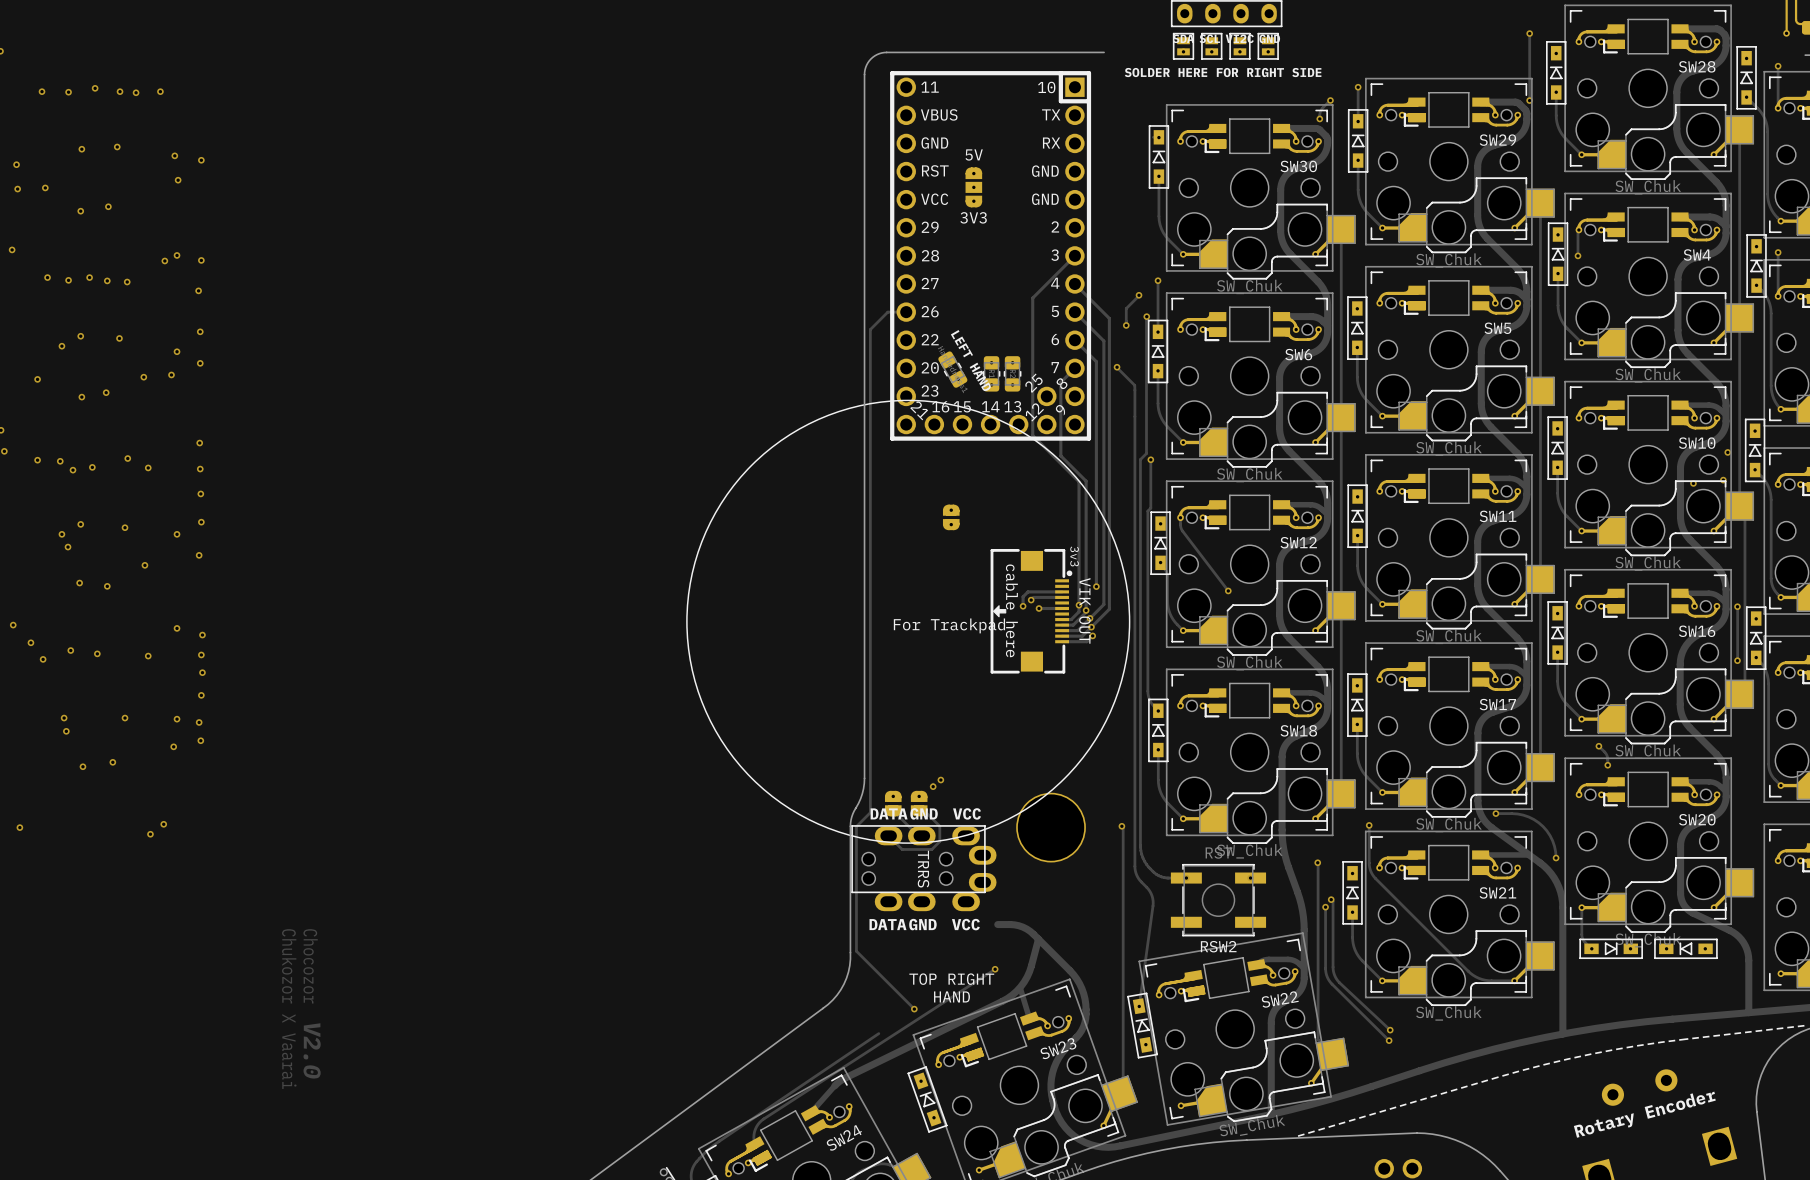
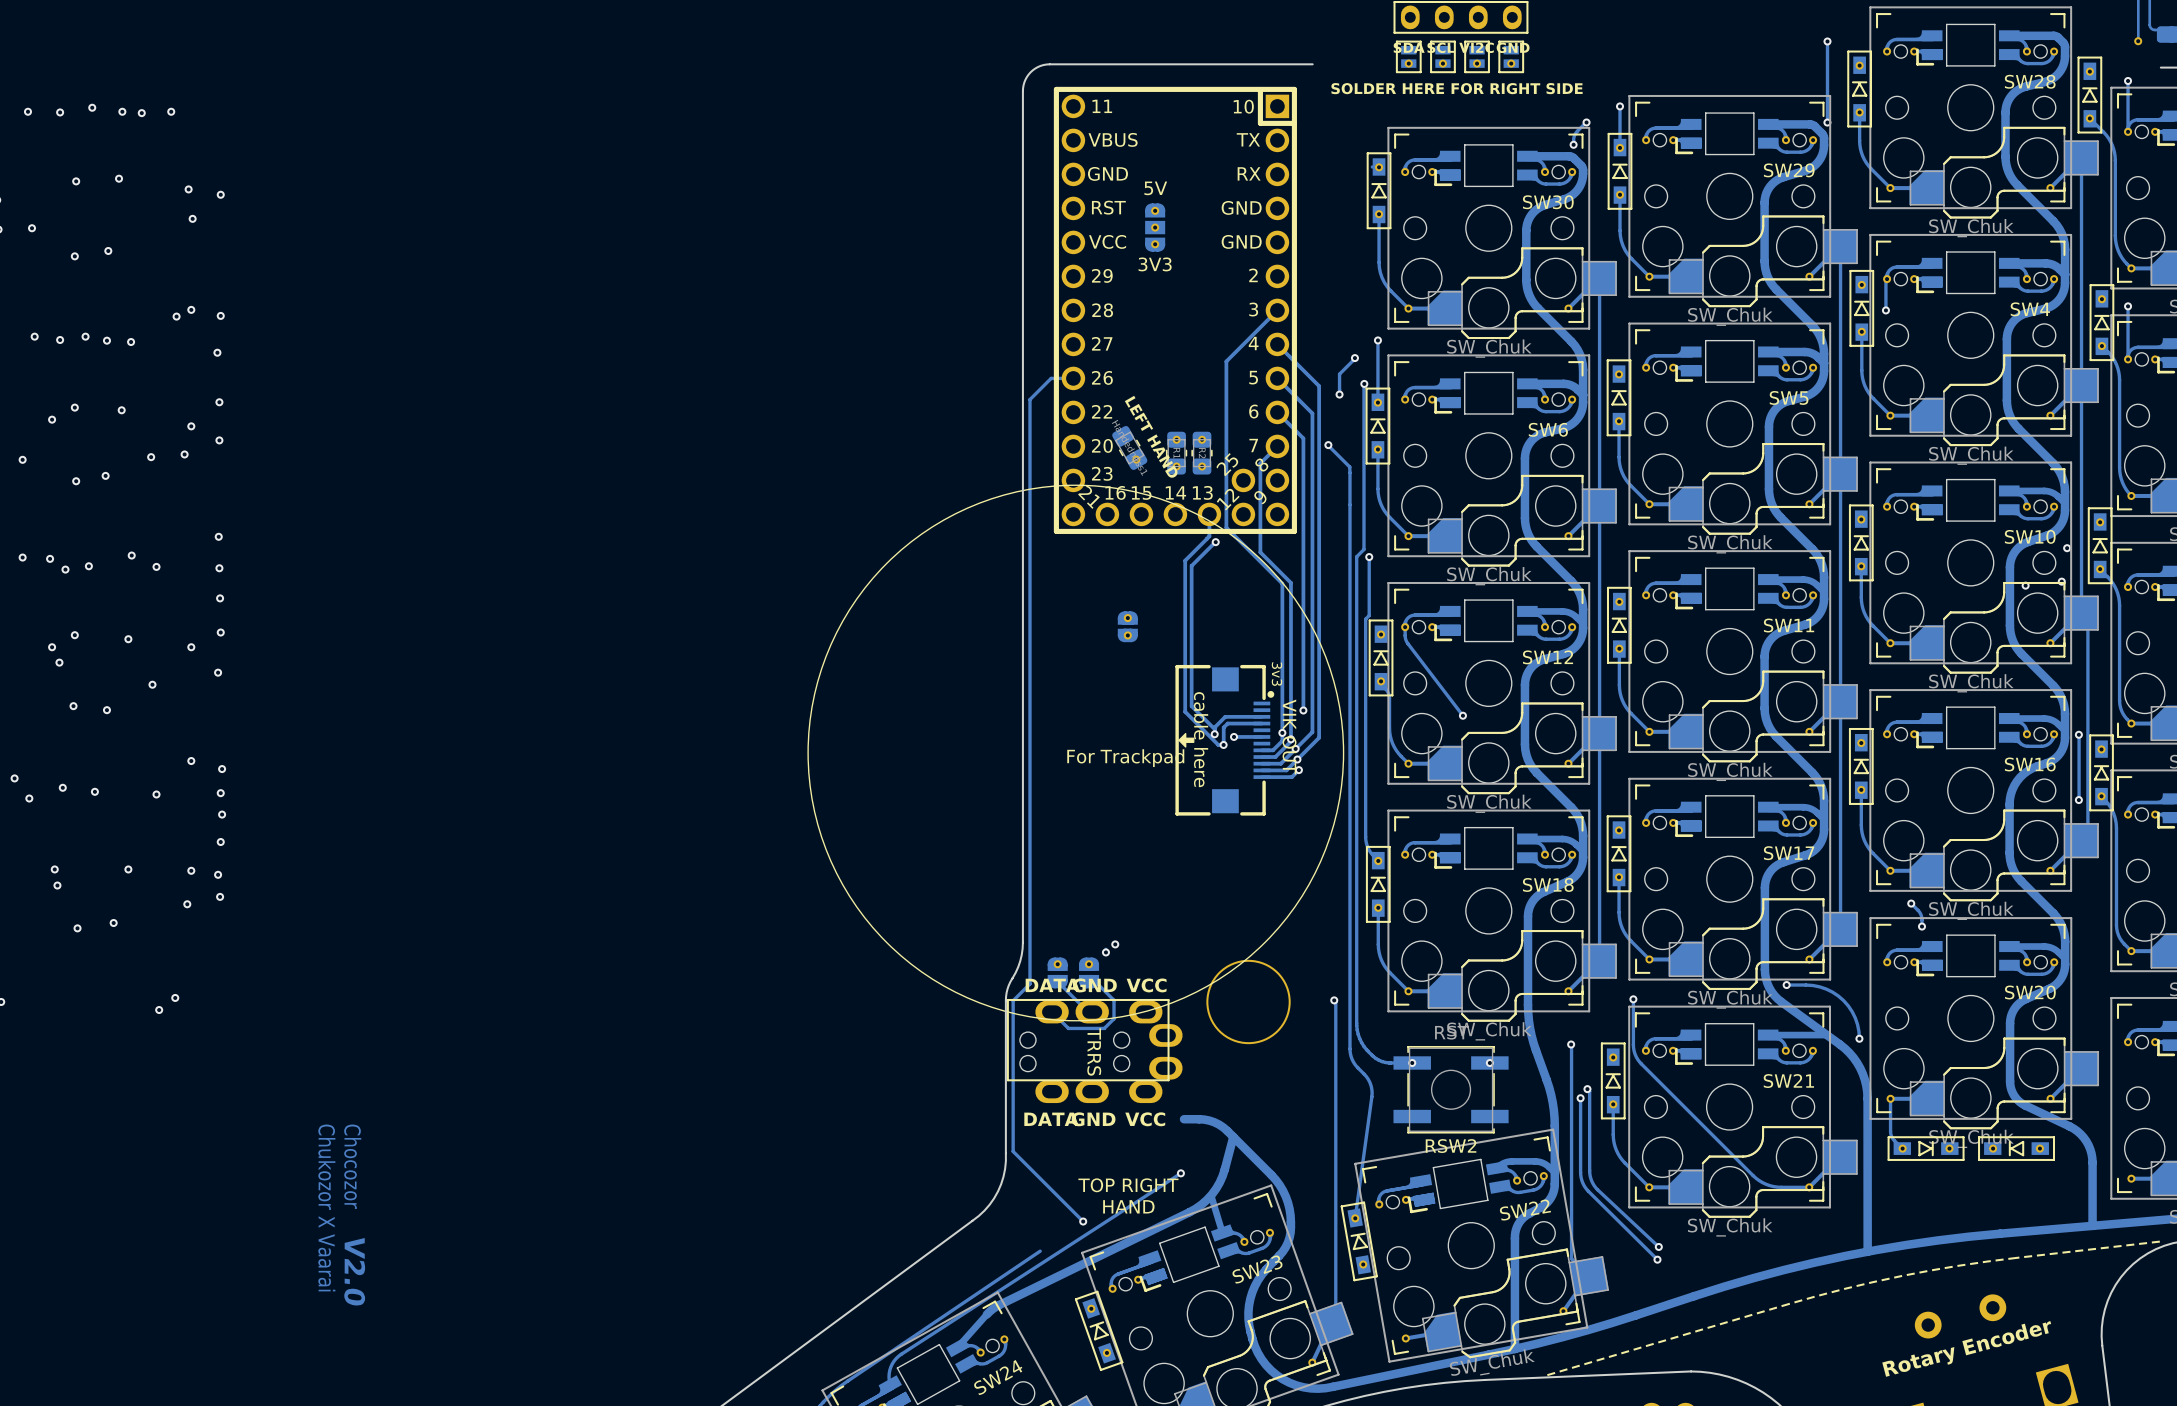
track: none -> (1209, 514) (1209, 536) (1185, 560) (1185, 711) (1218, 744) (1223, 744)
via: none -> (1215, 542)
track: (1031, 591) (1028, 591) (1023, 596) (1023, 606) -> (1225, 716) (1215, 727) (1215, 729) (1191, 706) (1191, 565) (1215, 542)
track: none -> (1224, 726) (1223, 744)
via position: (1031, 600) -> (1223, 744)

